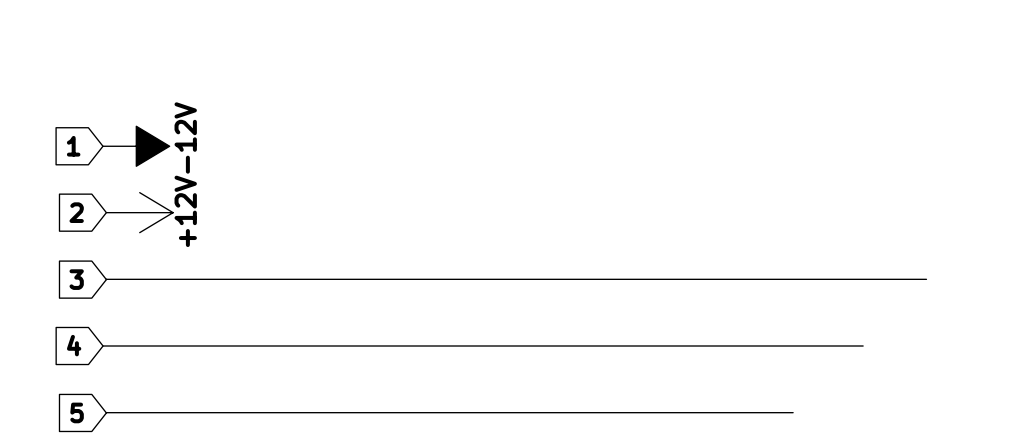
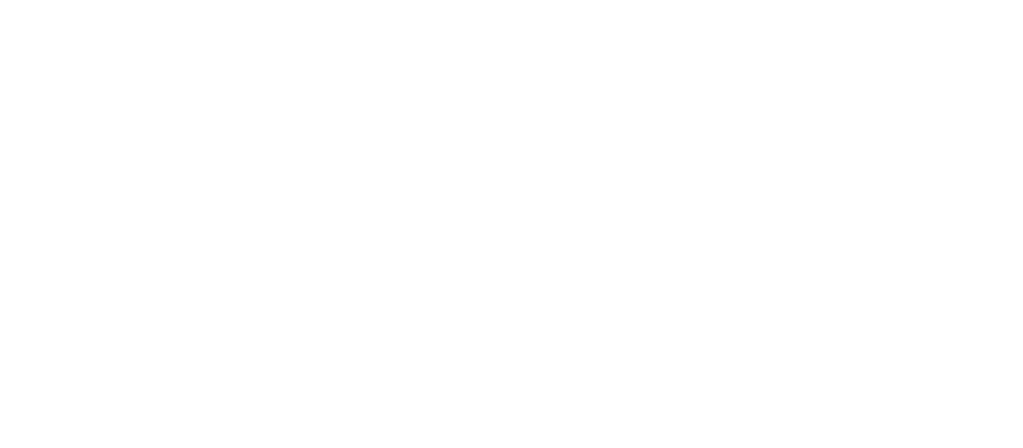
global label: 1 (73, 146) -> none
power symbol: -12V (136, 146) -> none
global label: 2 (76, 212) -> none
power symbol: +12V (139, 212) -> none
global label: 3 (76, 279) -> none
wire: (106, 279) (926, 279) -> none
global label: 4 (74, 345) -> none
wire: (103, 346) (863, 346) -> none
global label: 5 (77, 412) -> none
wire: (106, 412) (793, 412) -> none

